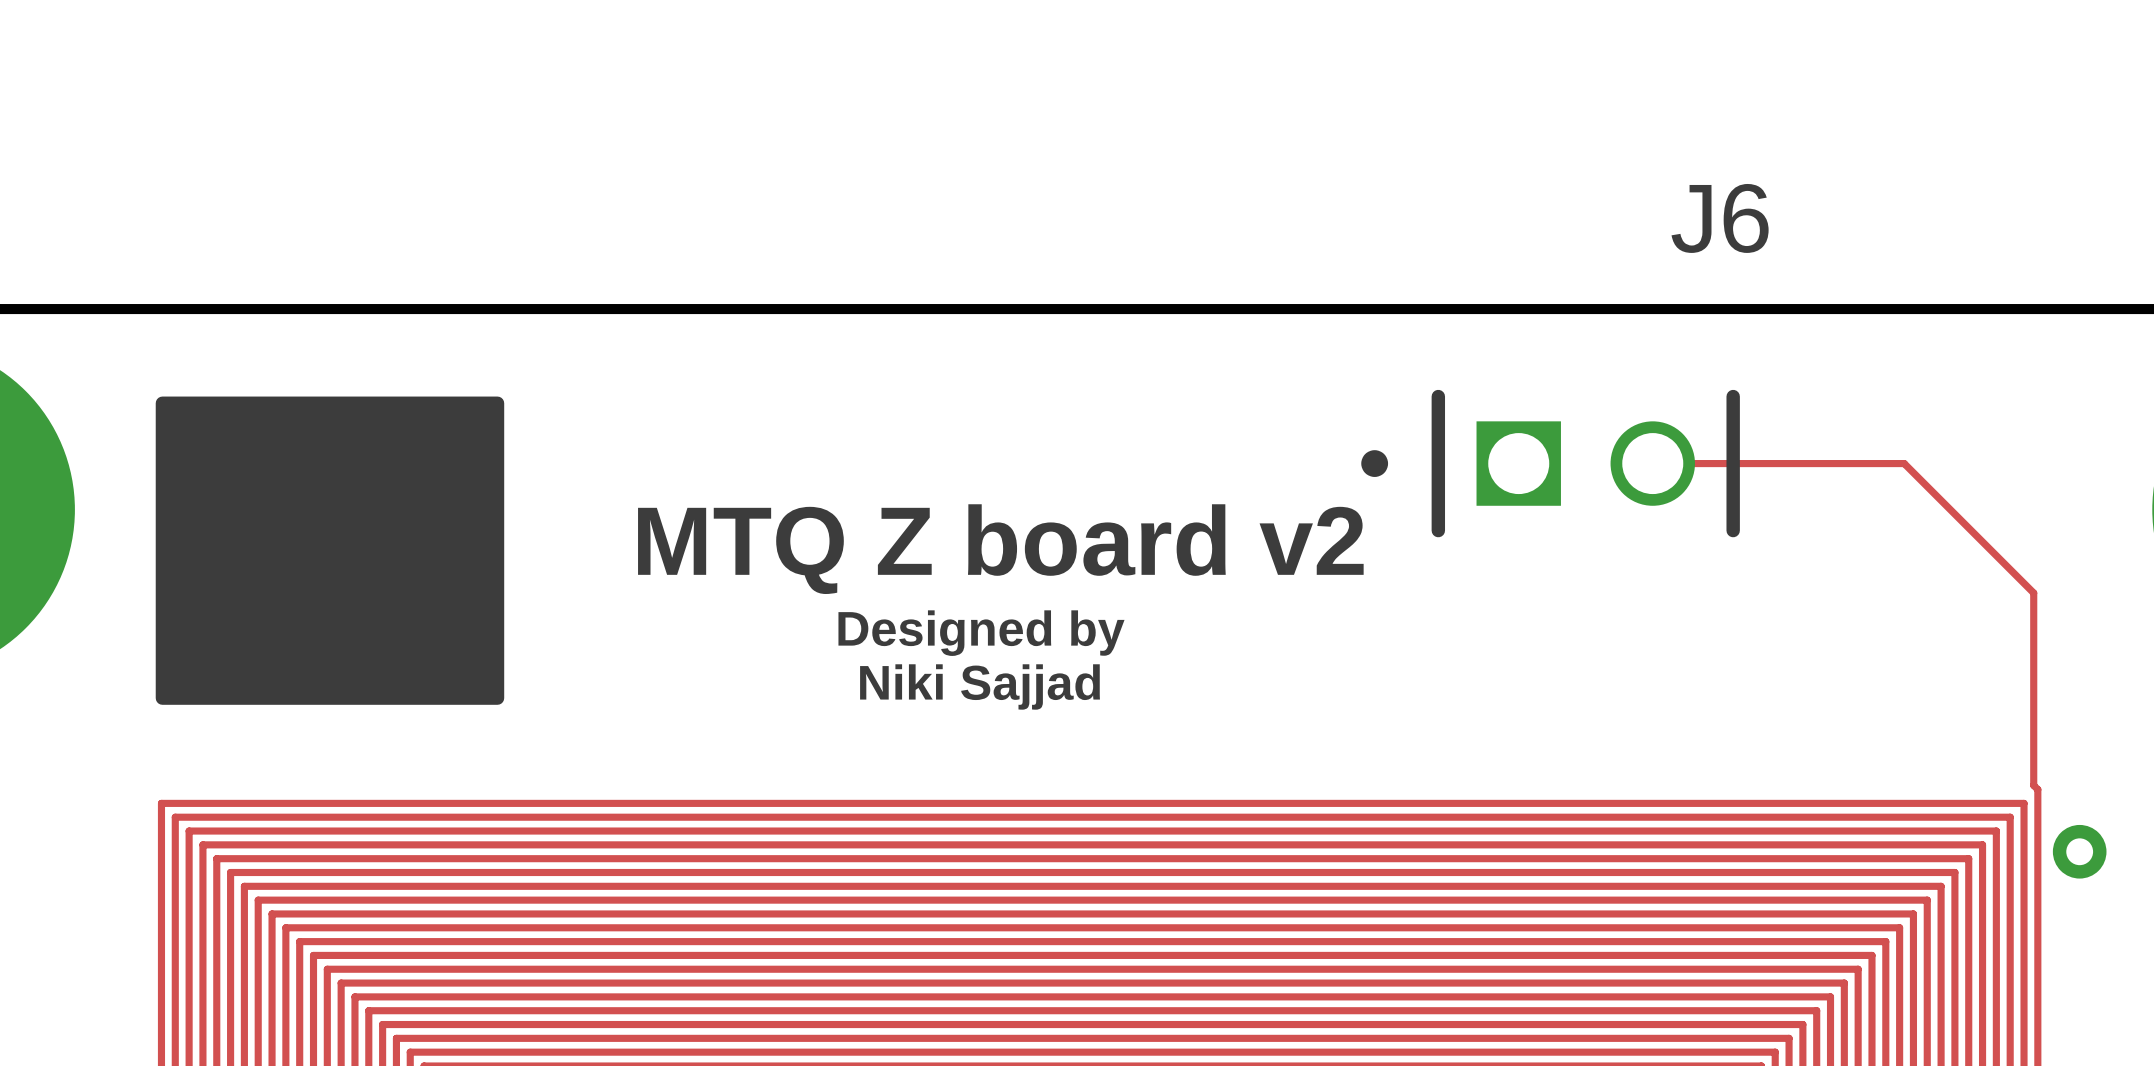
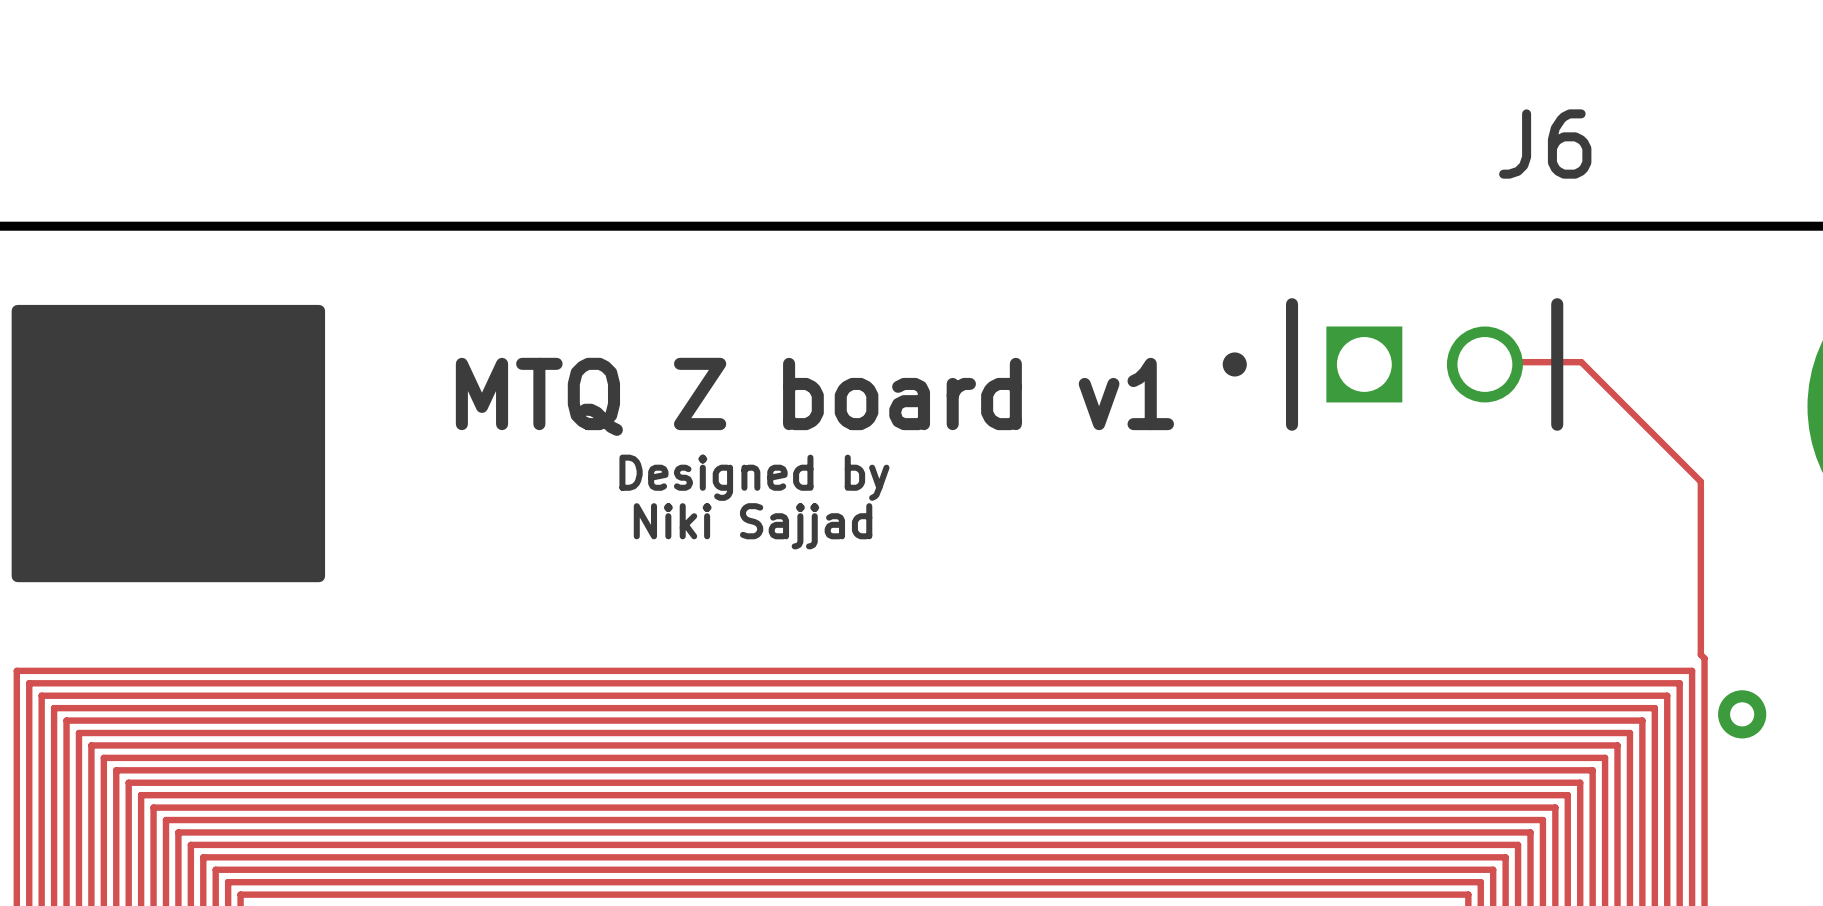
J6 position: (1550, 463) -> (1392, 364)
track: (1652, 463) (1904, 463) -> (1486, 362) (1581, 362) (1584, 365)
text: MTQ Z board v2 (1000, 549) -> MTQ Z board v1 (814, 396)
text position: Designed by (981, 633) -> Designed by (754, 477)
text position: Niki Sajjad (980, 686) -> Niki Sajjad (753, 526)

